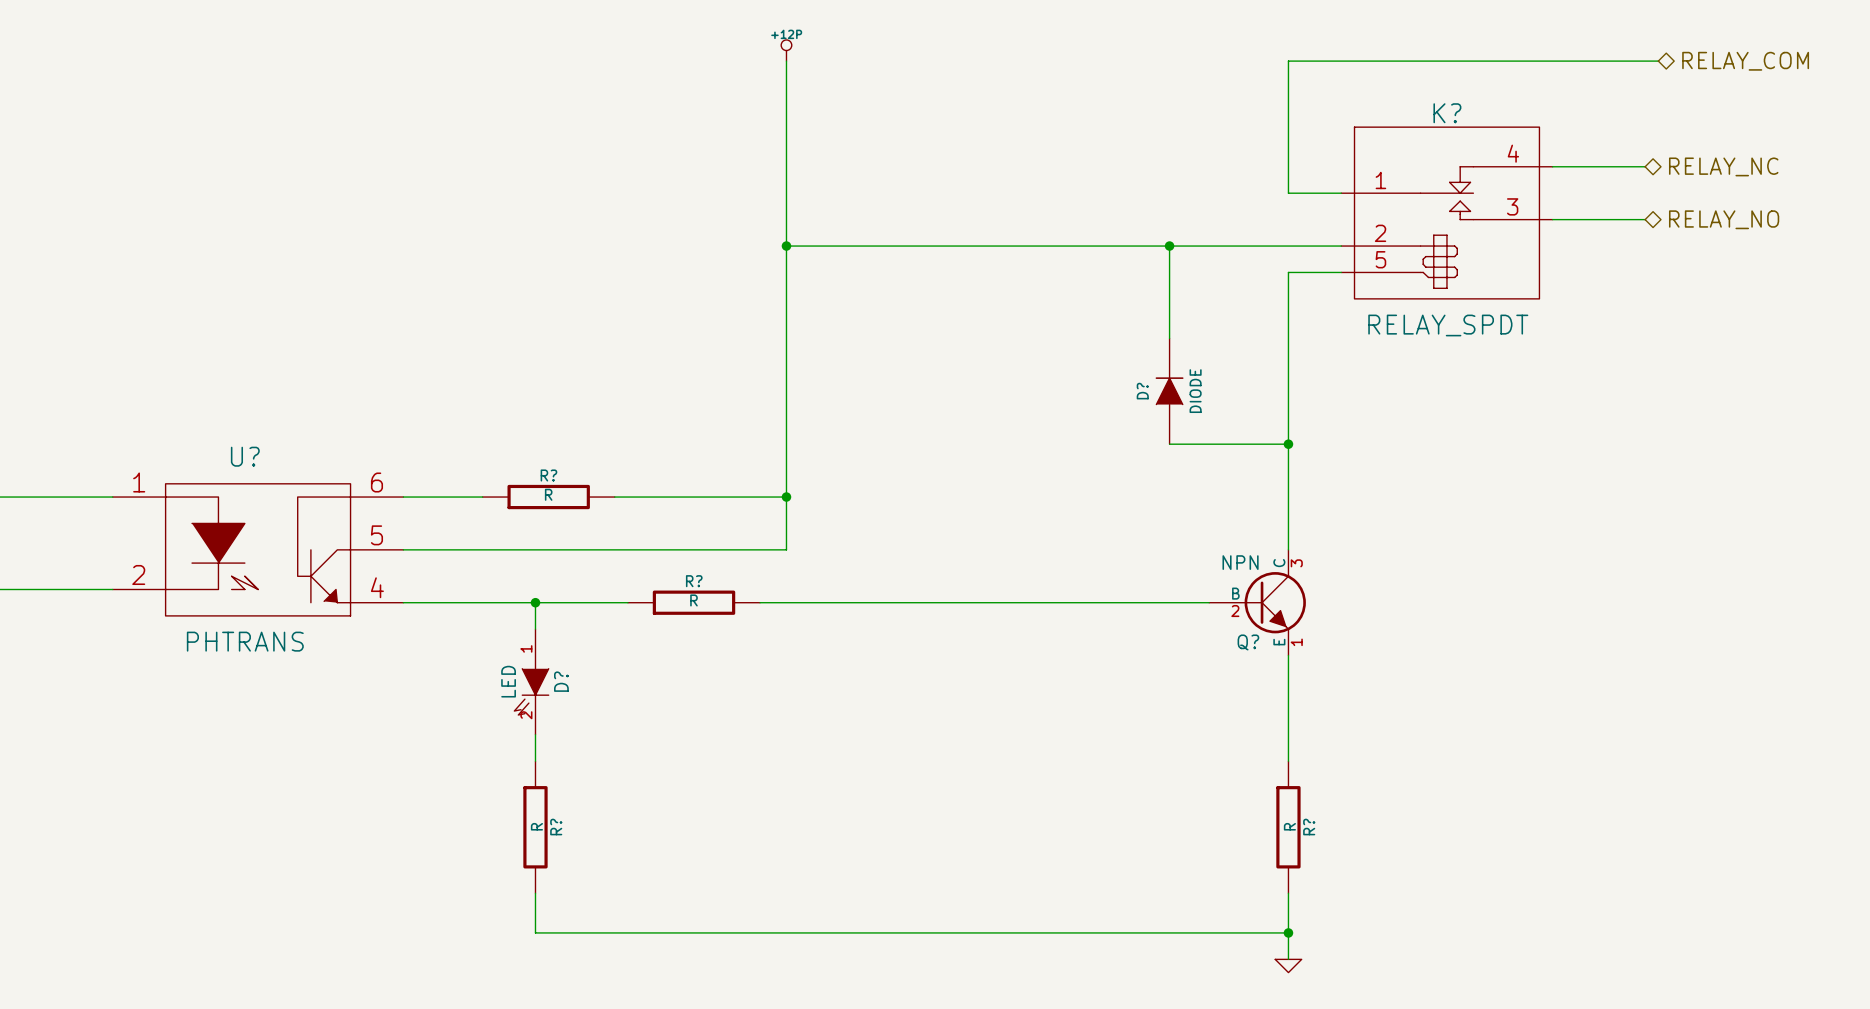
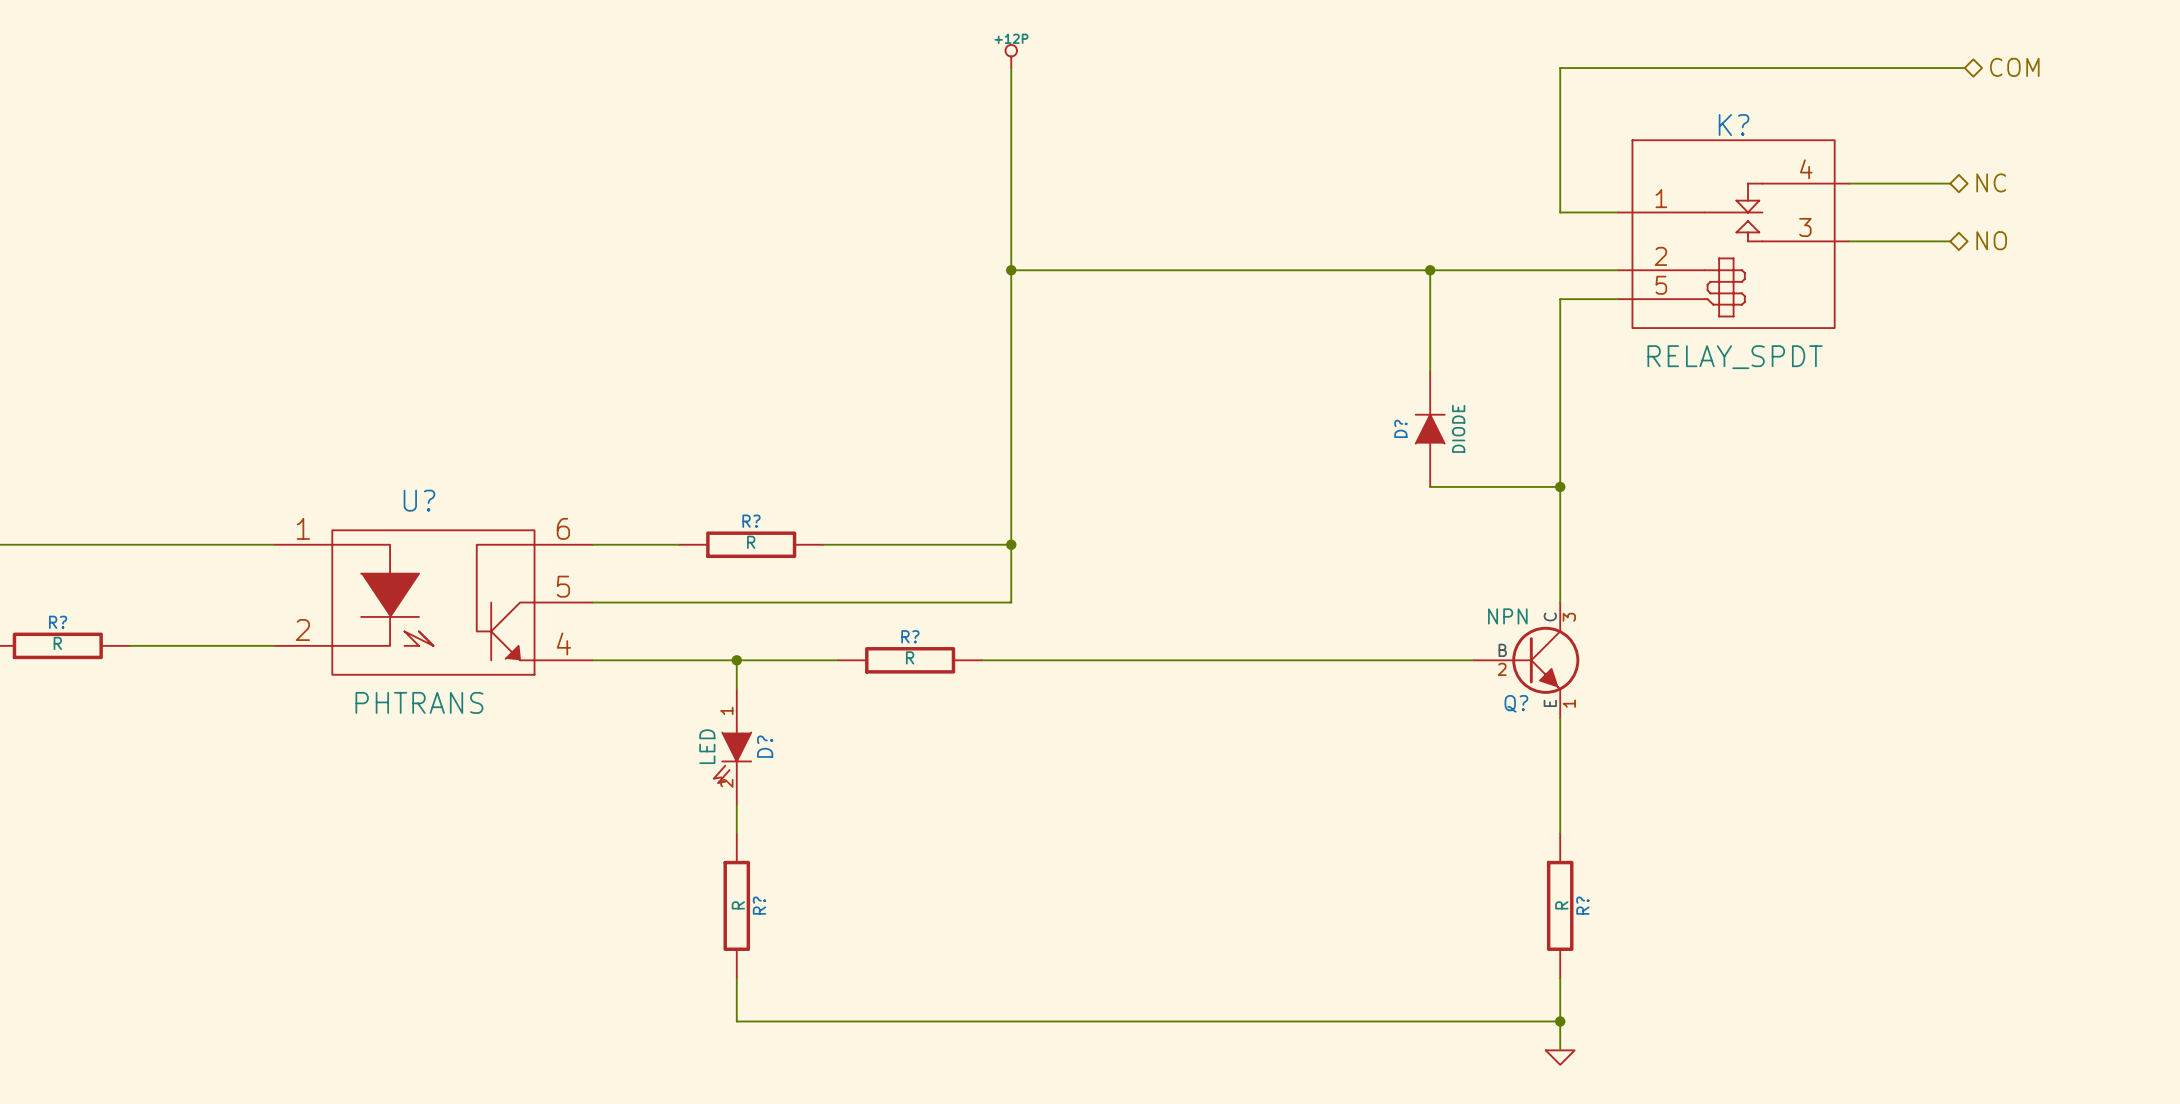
hierarchical label: RELAY_COM (1745, 61) -> COM (2014, 67)
hierarchical label: RELAY_NC (1723, 166) -> NC (1991, 182)
hierarchical label: RELAY_NO (1724, 219) -> NO (1991, 240)

